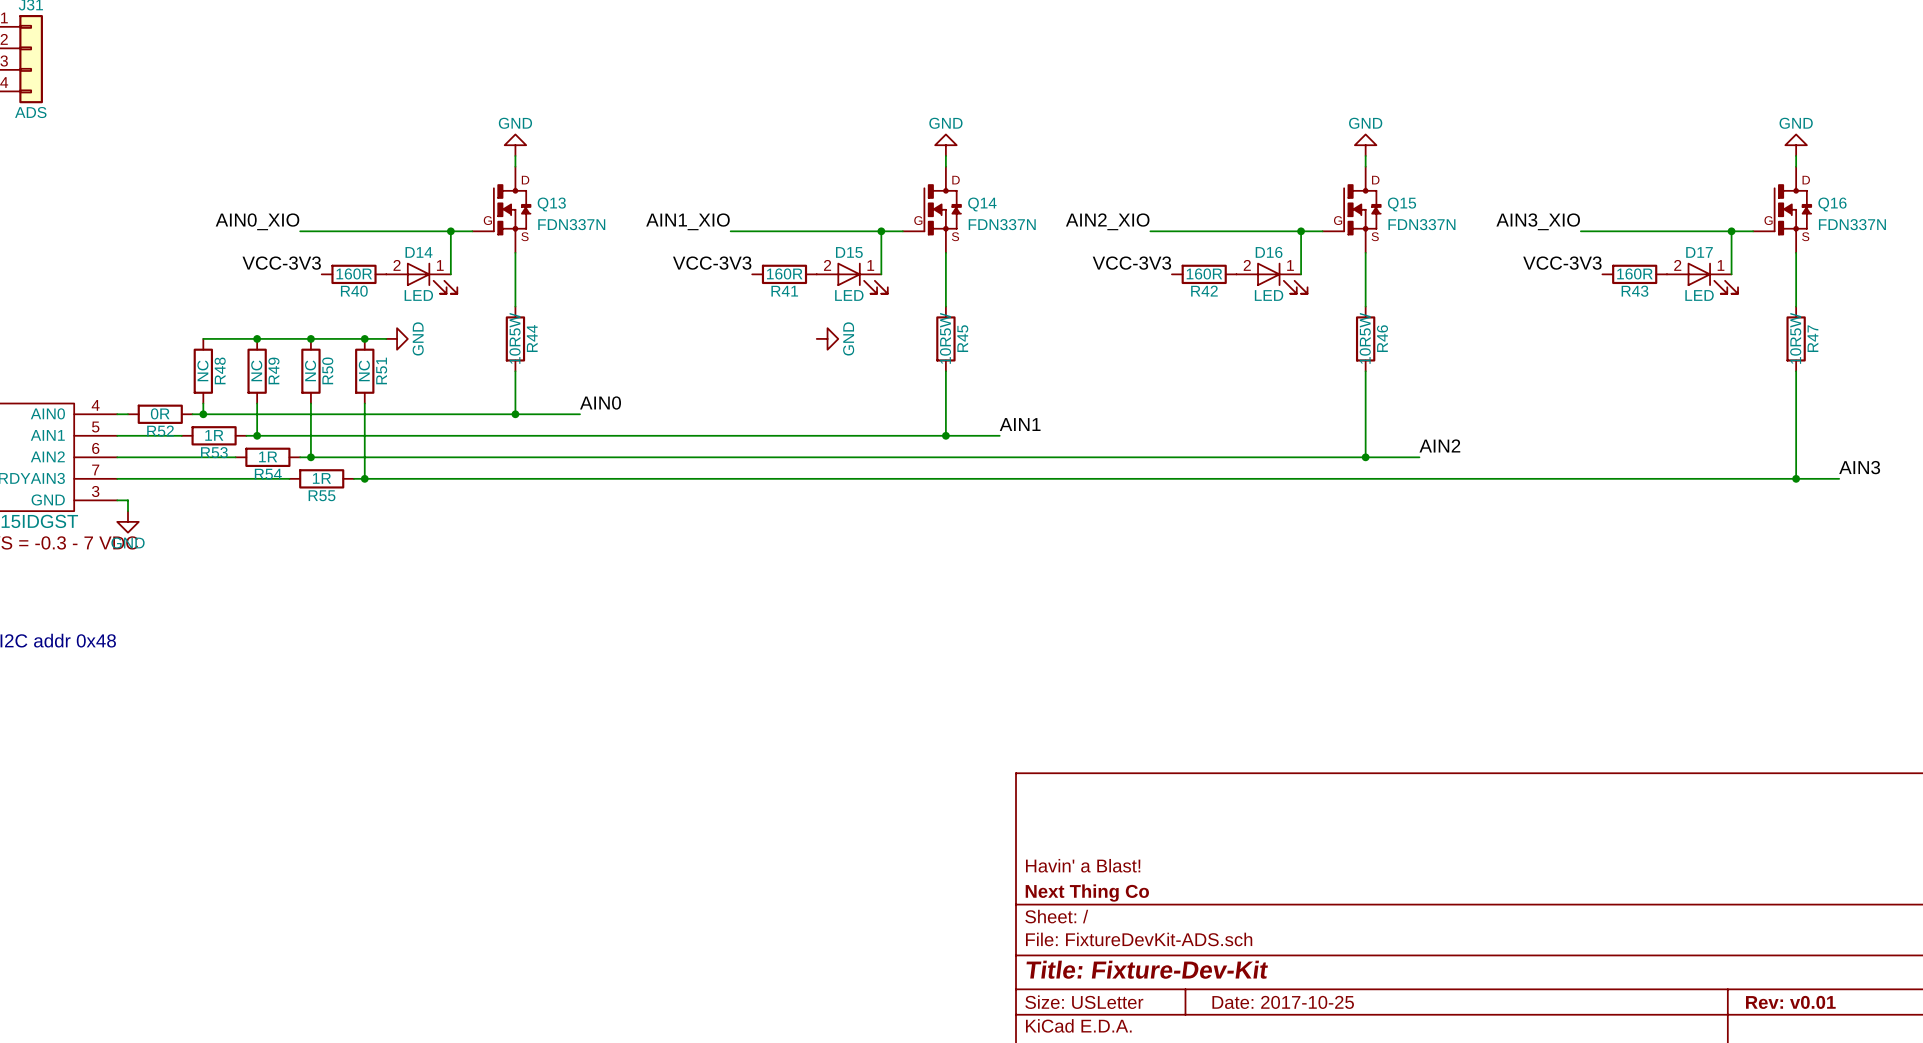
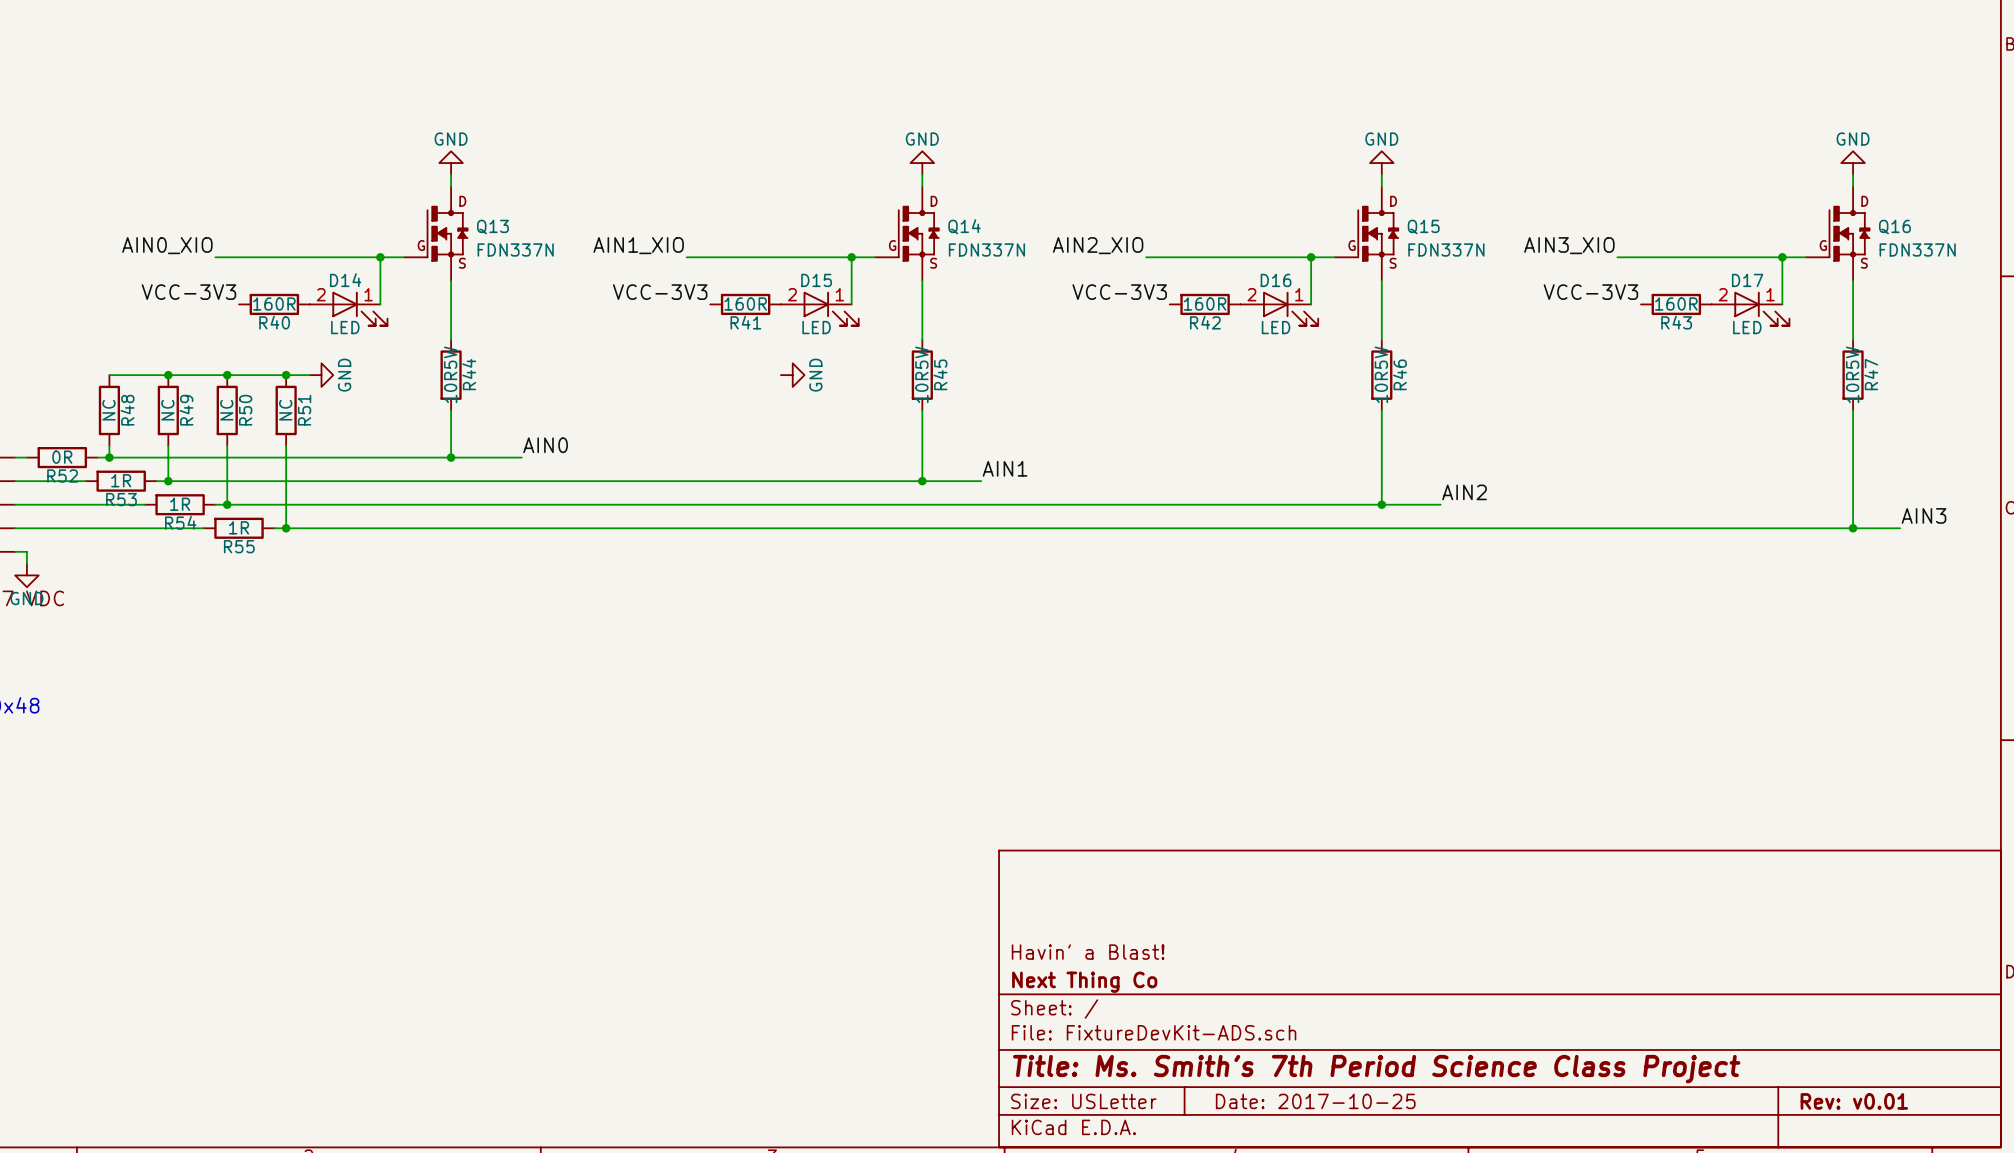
title block: Title: Fixture-Dev-Kit (1147, 969) -> Title: Ms. Smith's 7th Period Science Class Project (1376, 1069)

